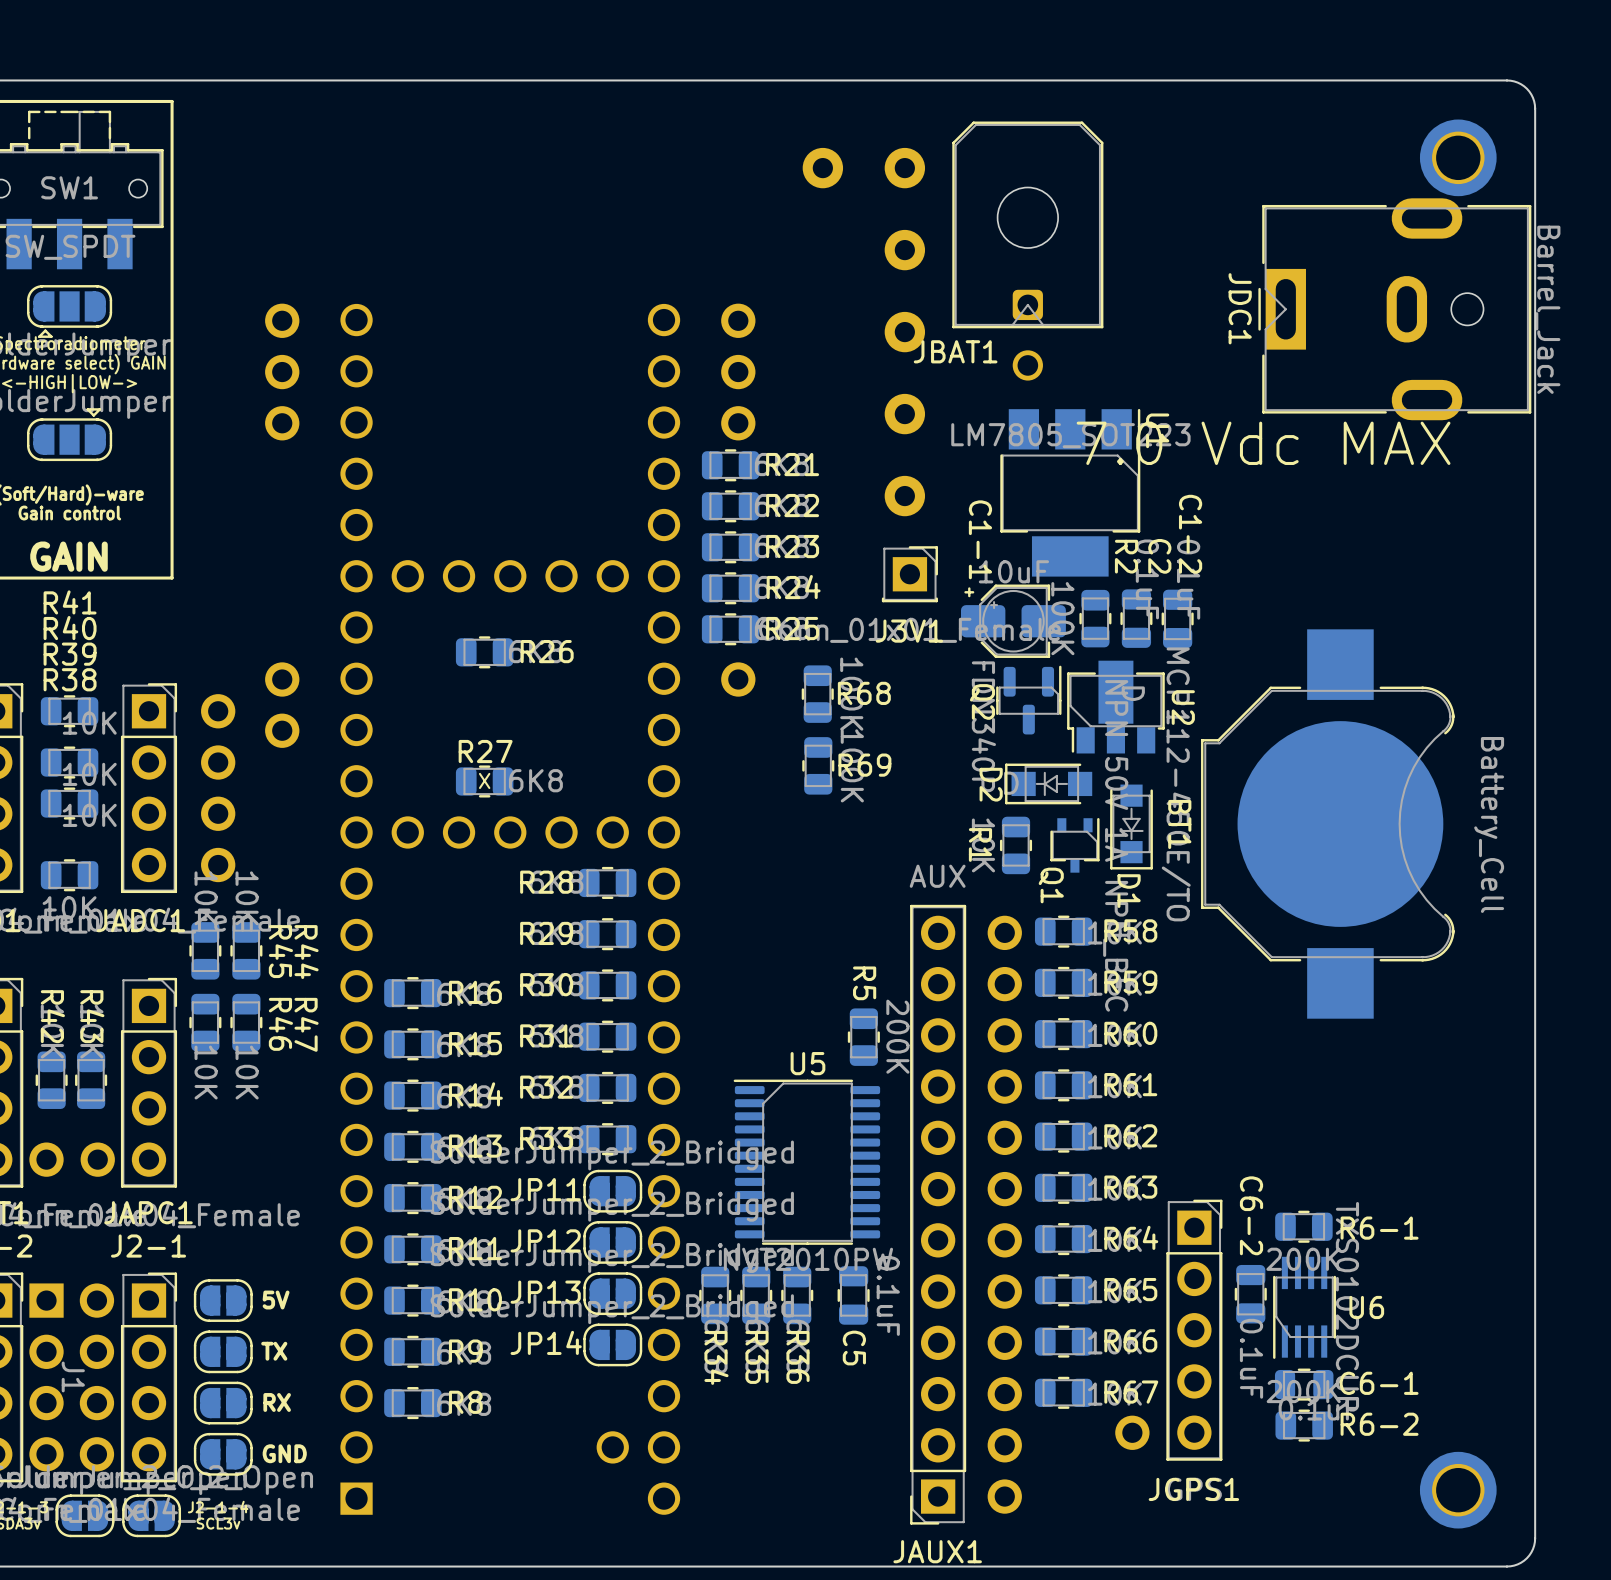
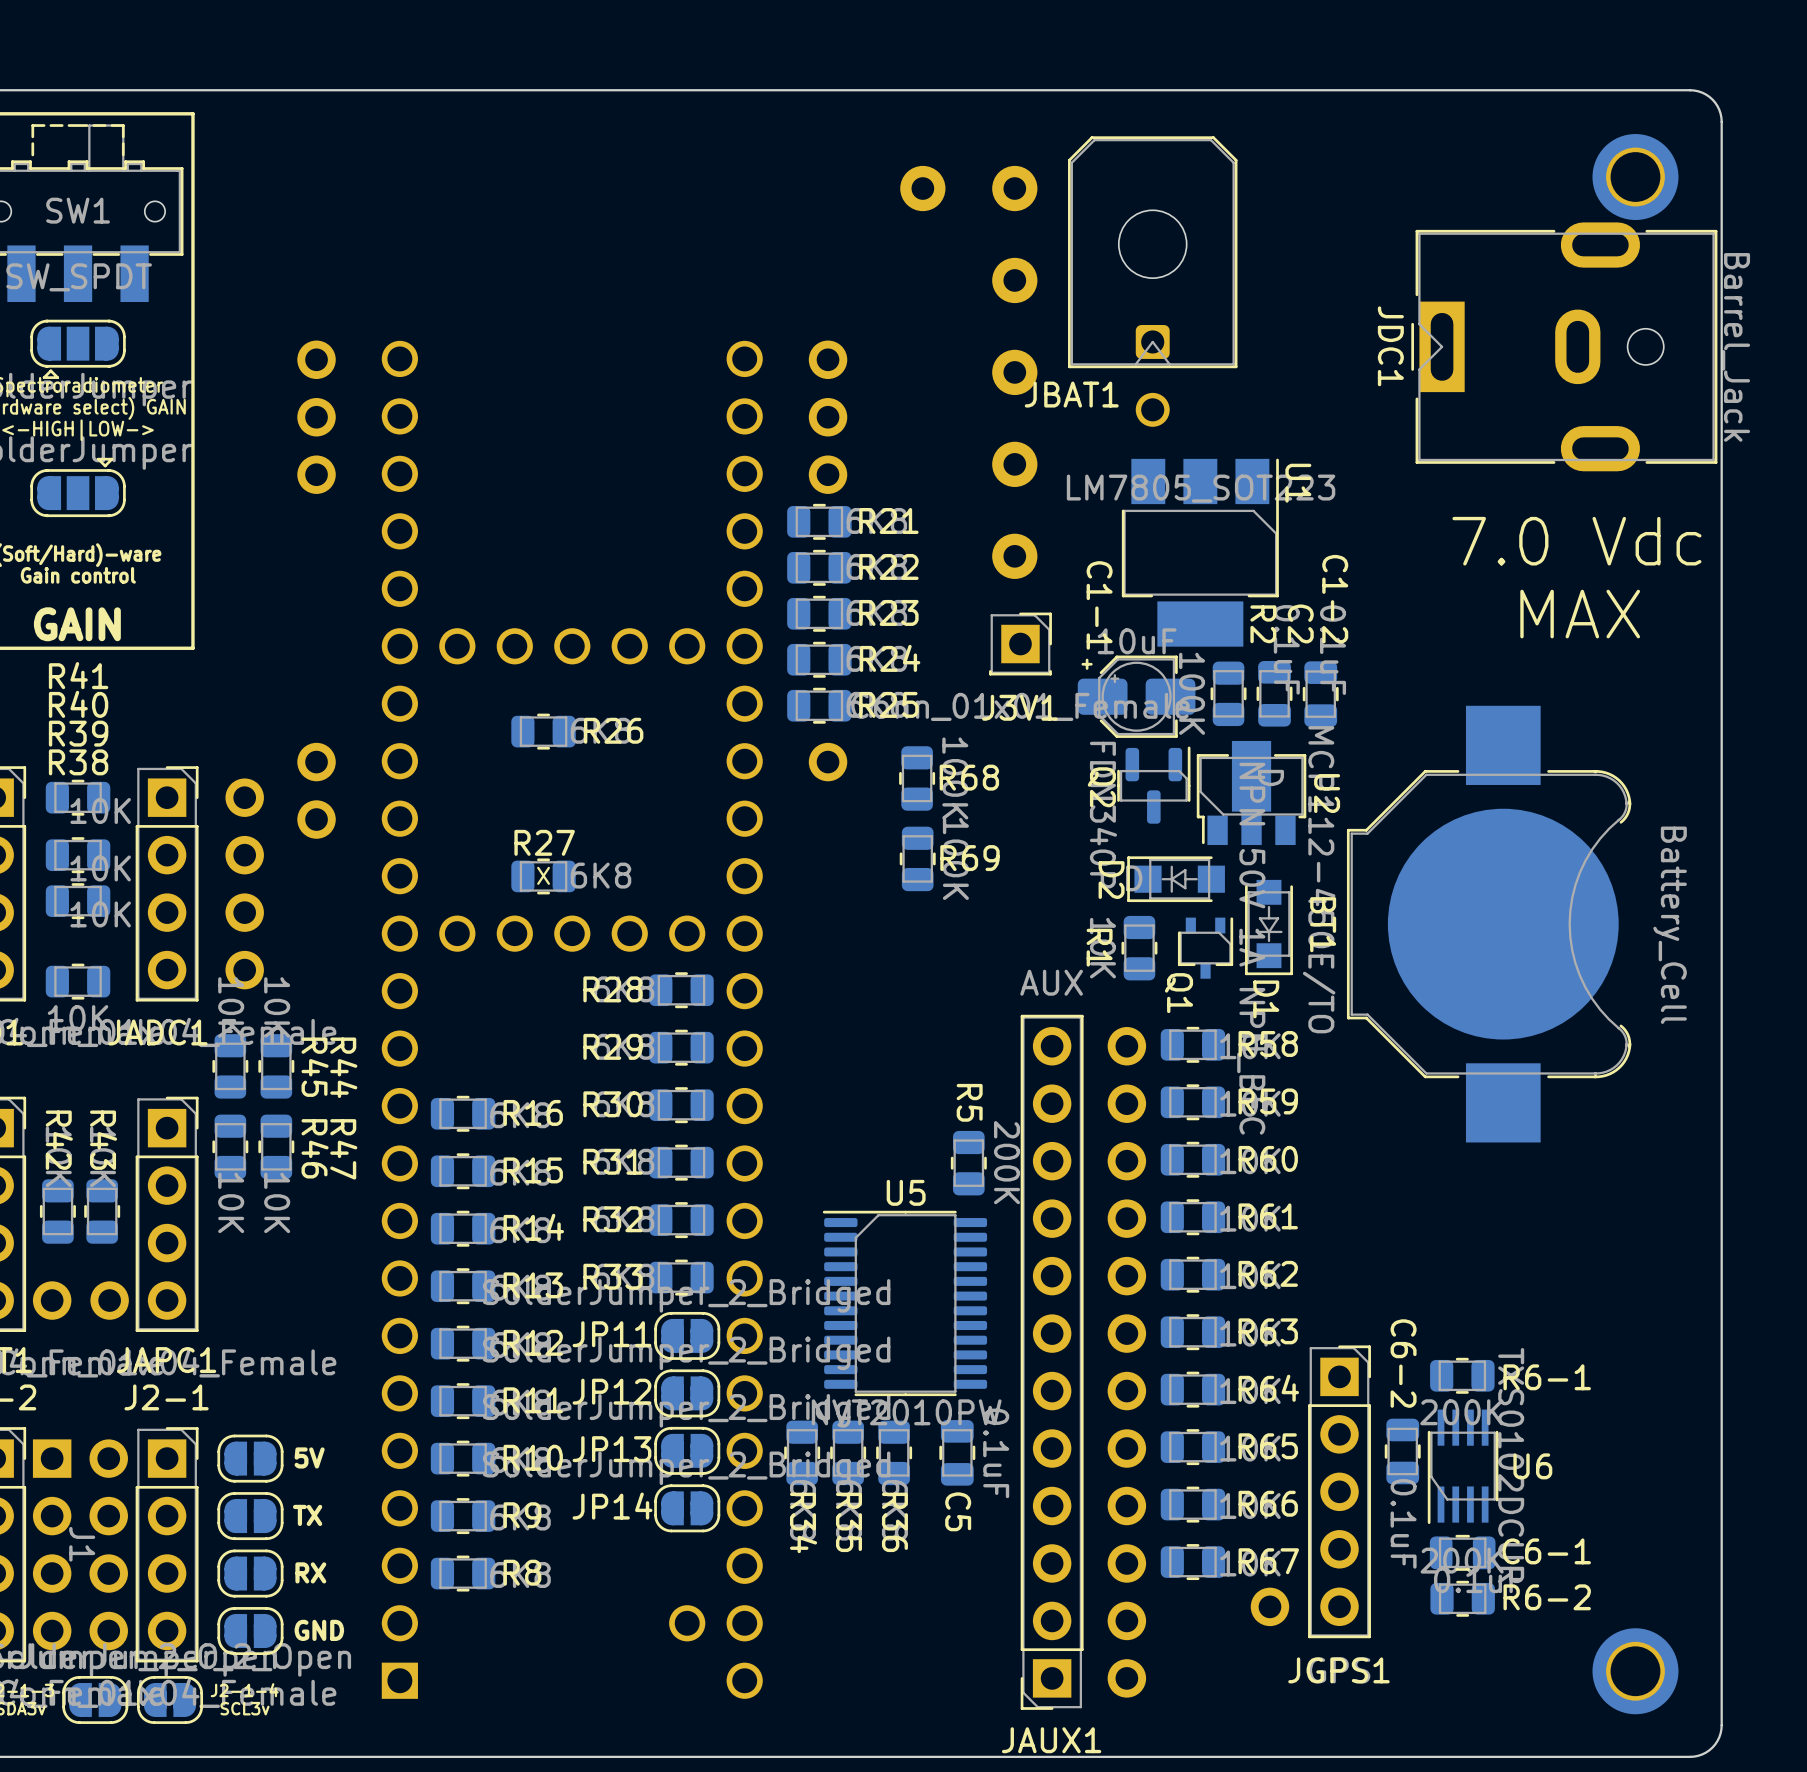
text: 7.0 Vdc MAX (1263, 443) -> 7.0 Vdc (1576, 541)
text: none -> MAX (1580, 614)

